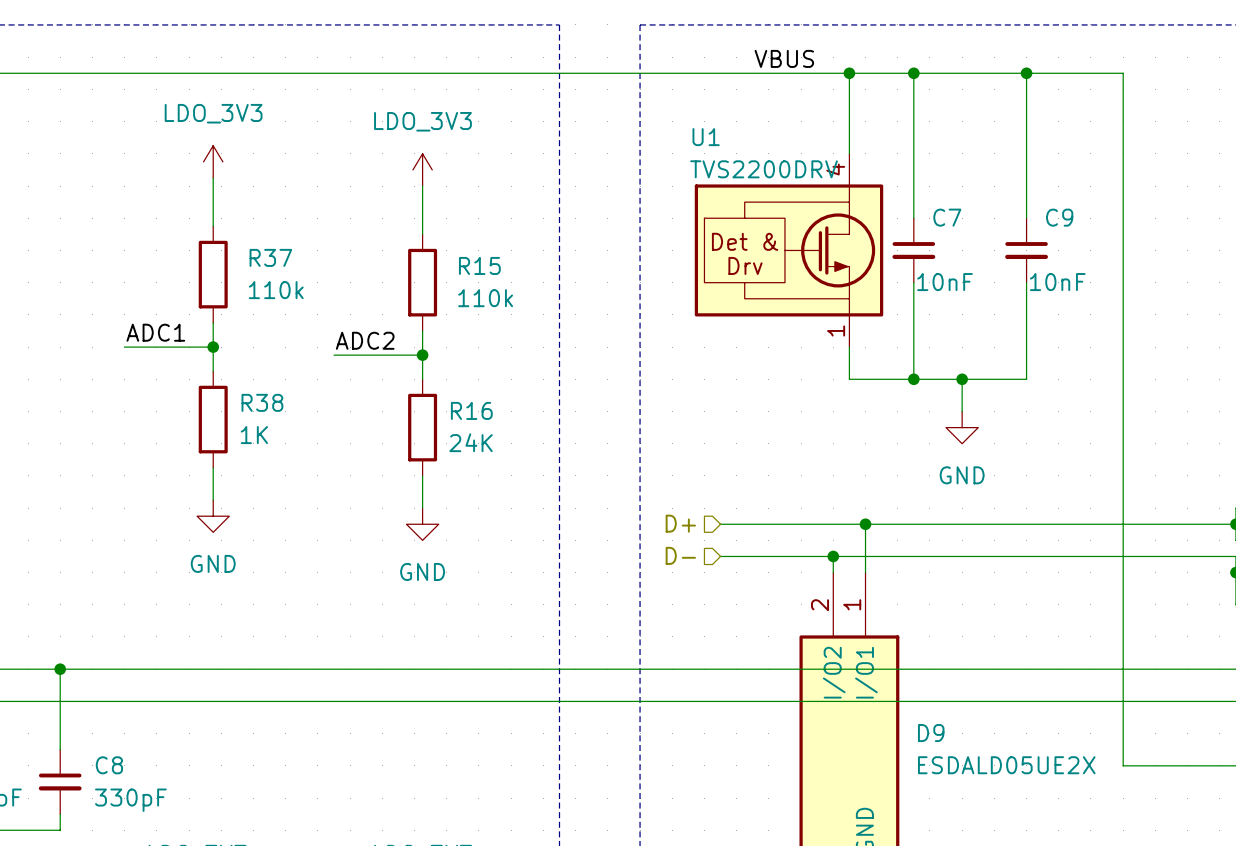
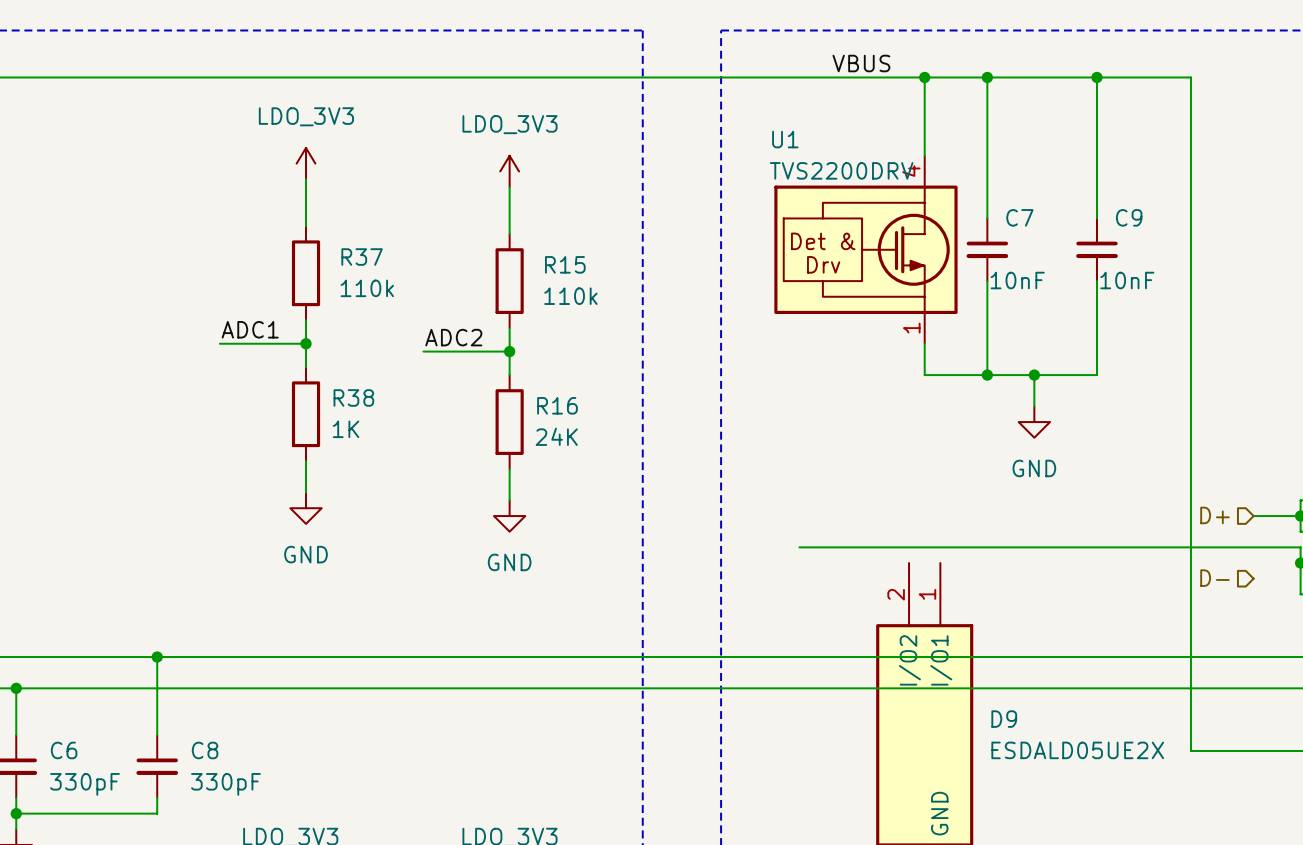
hierarchical label: D+ (680, 523) -> none
hierarchical label: none -> D+ (1214, 515)
wire: (720, 524) (1187, 524) -> none
wire: (865, 524) (865, 572) -> none
junction: (865, 524) -> none
hierarchical label: D- (680, 555) -> none
wire: (833, 556) (833, 572) -> none
junction: (833, 556) -> none
hierarchical label: none -> D- (1214, 578)

